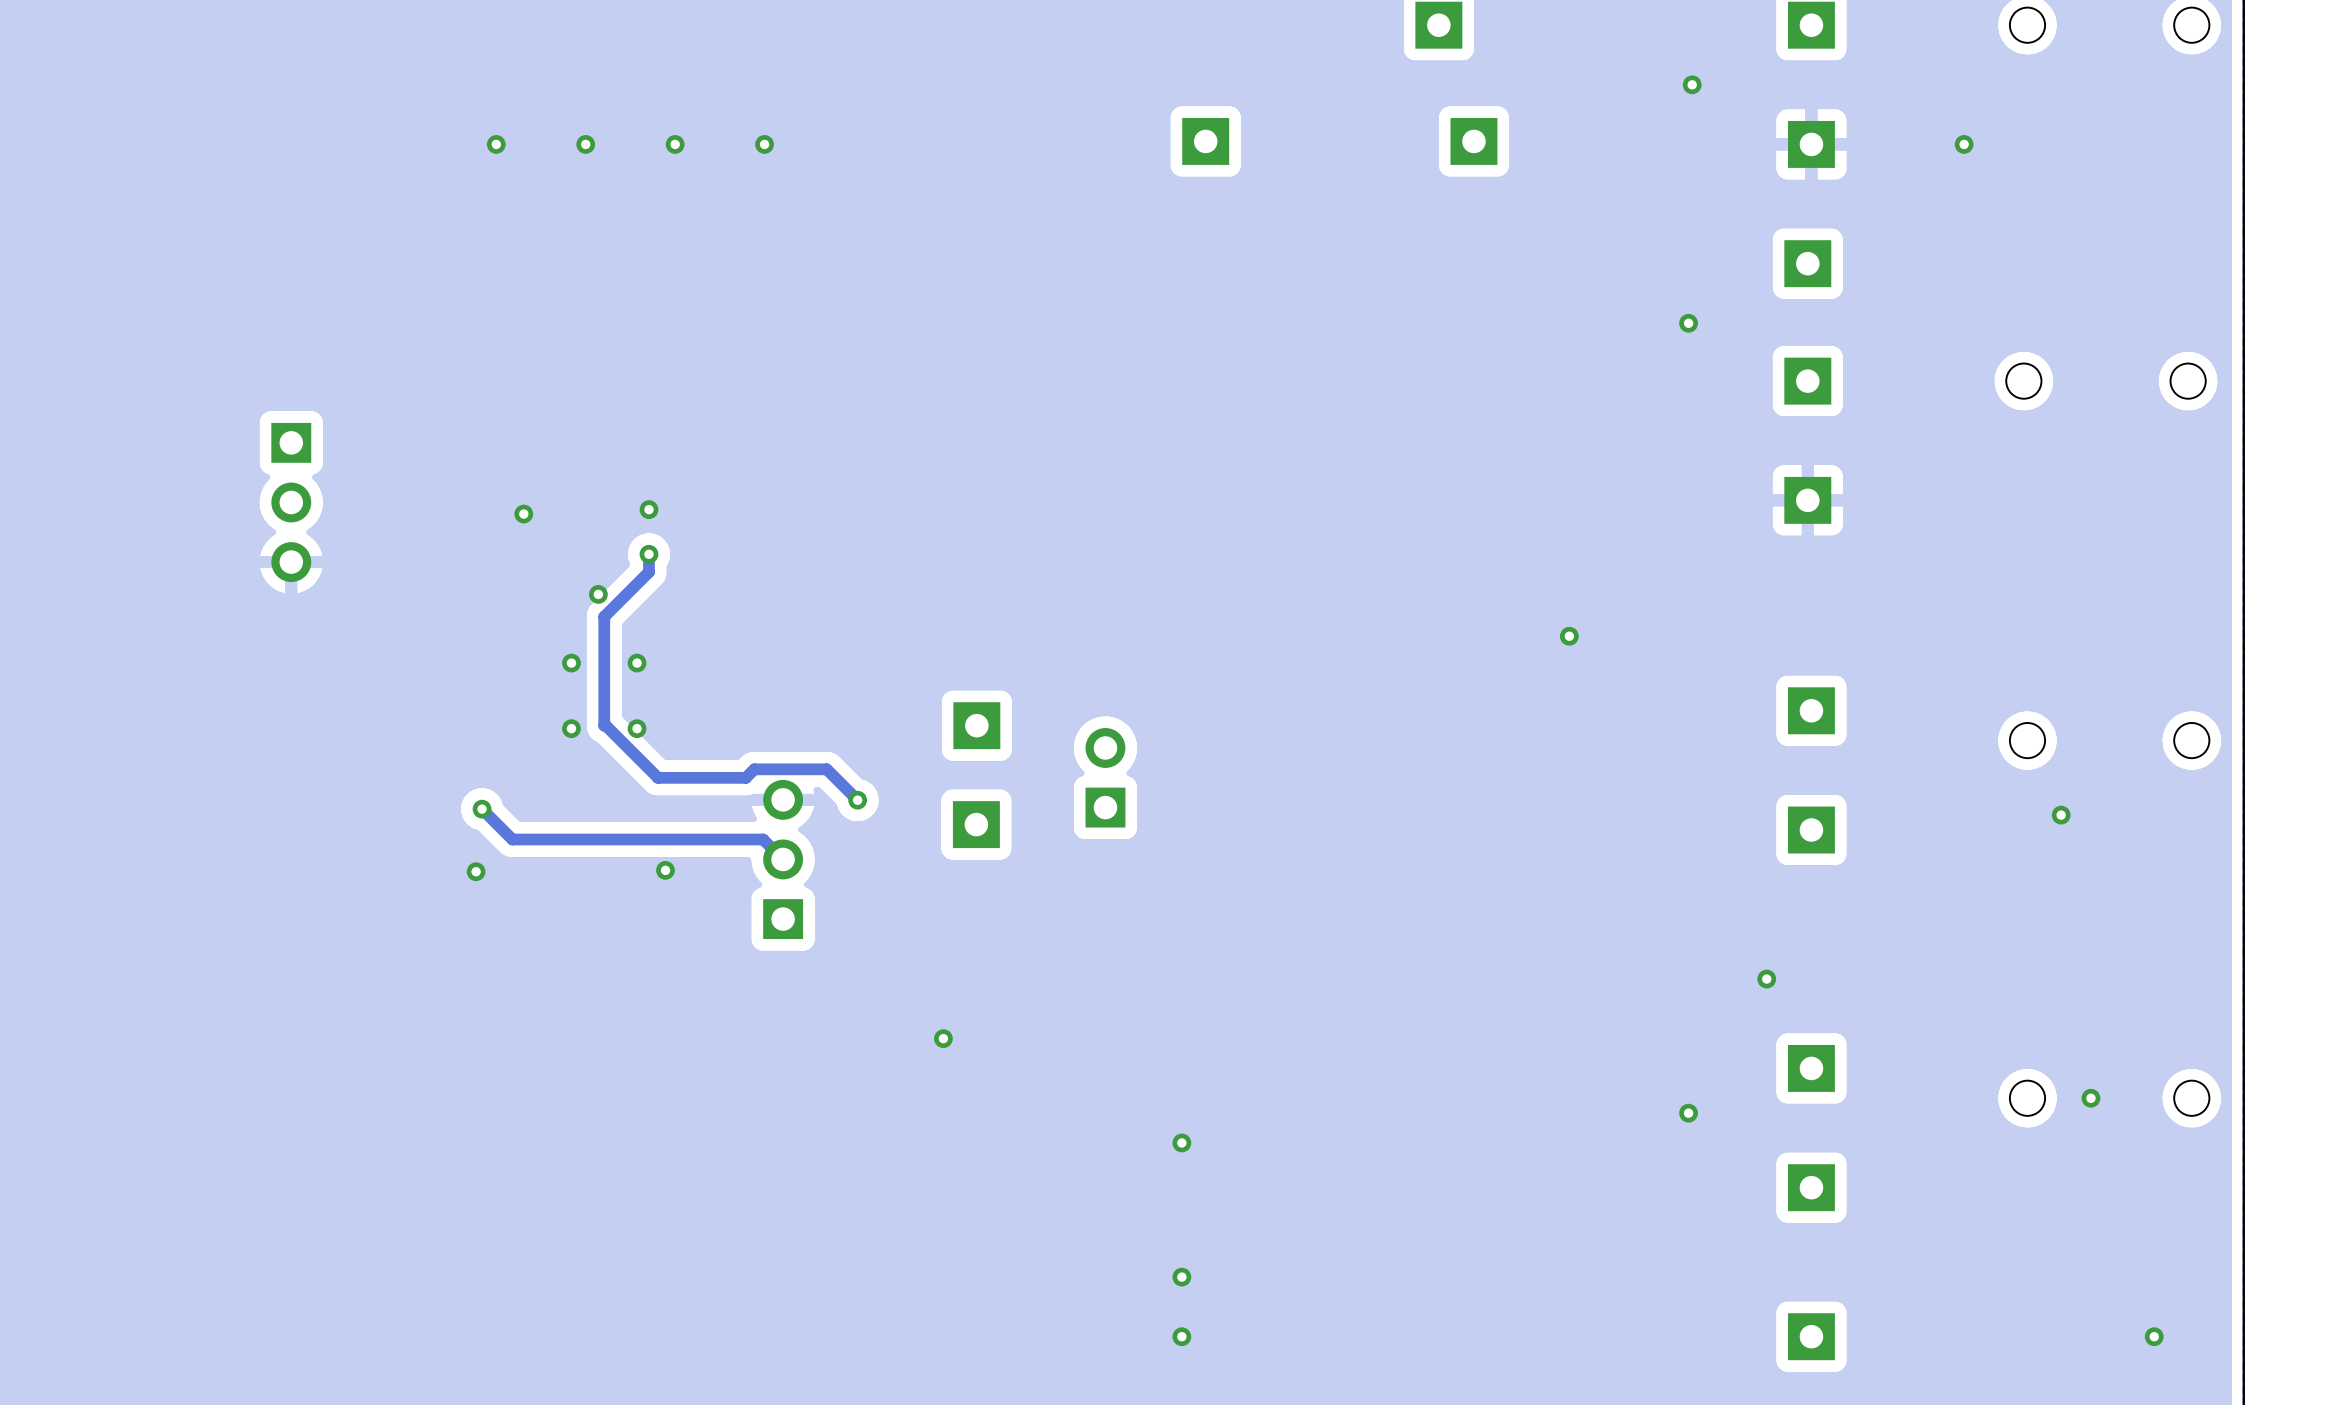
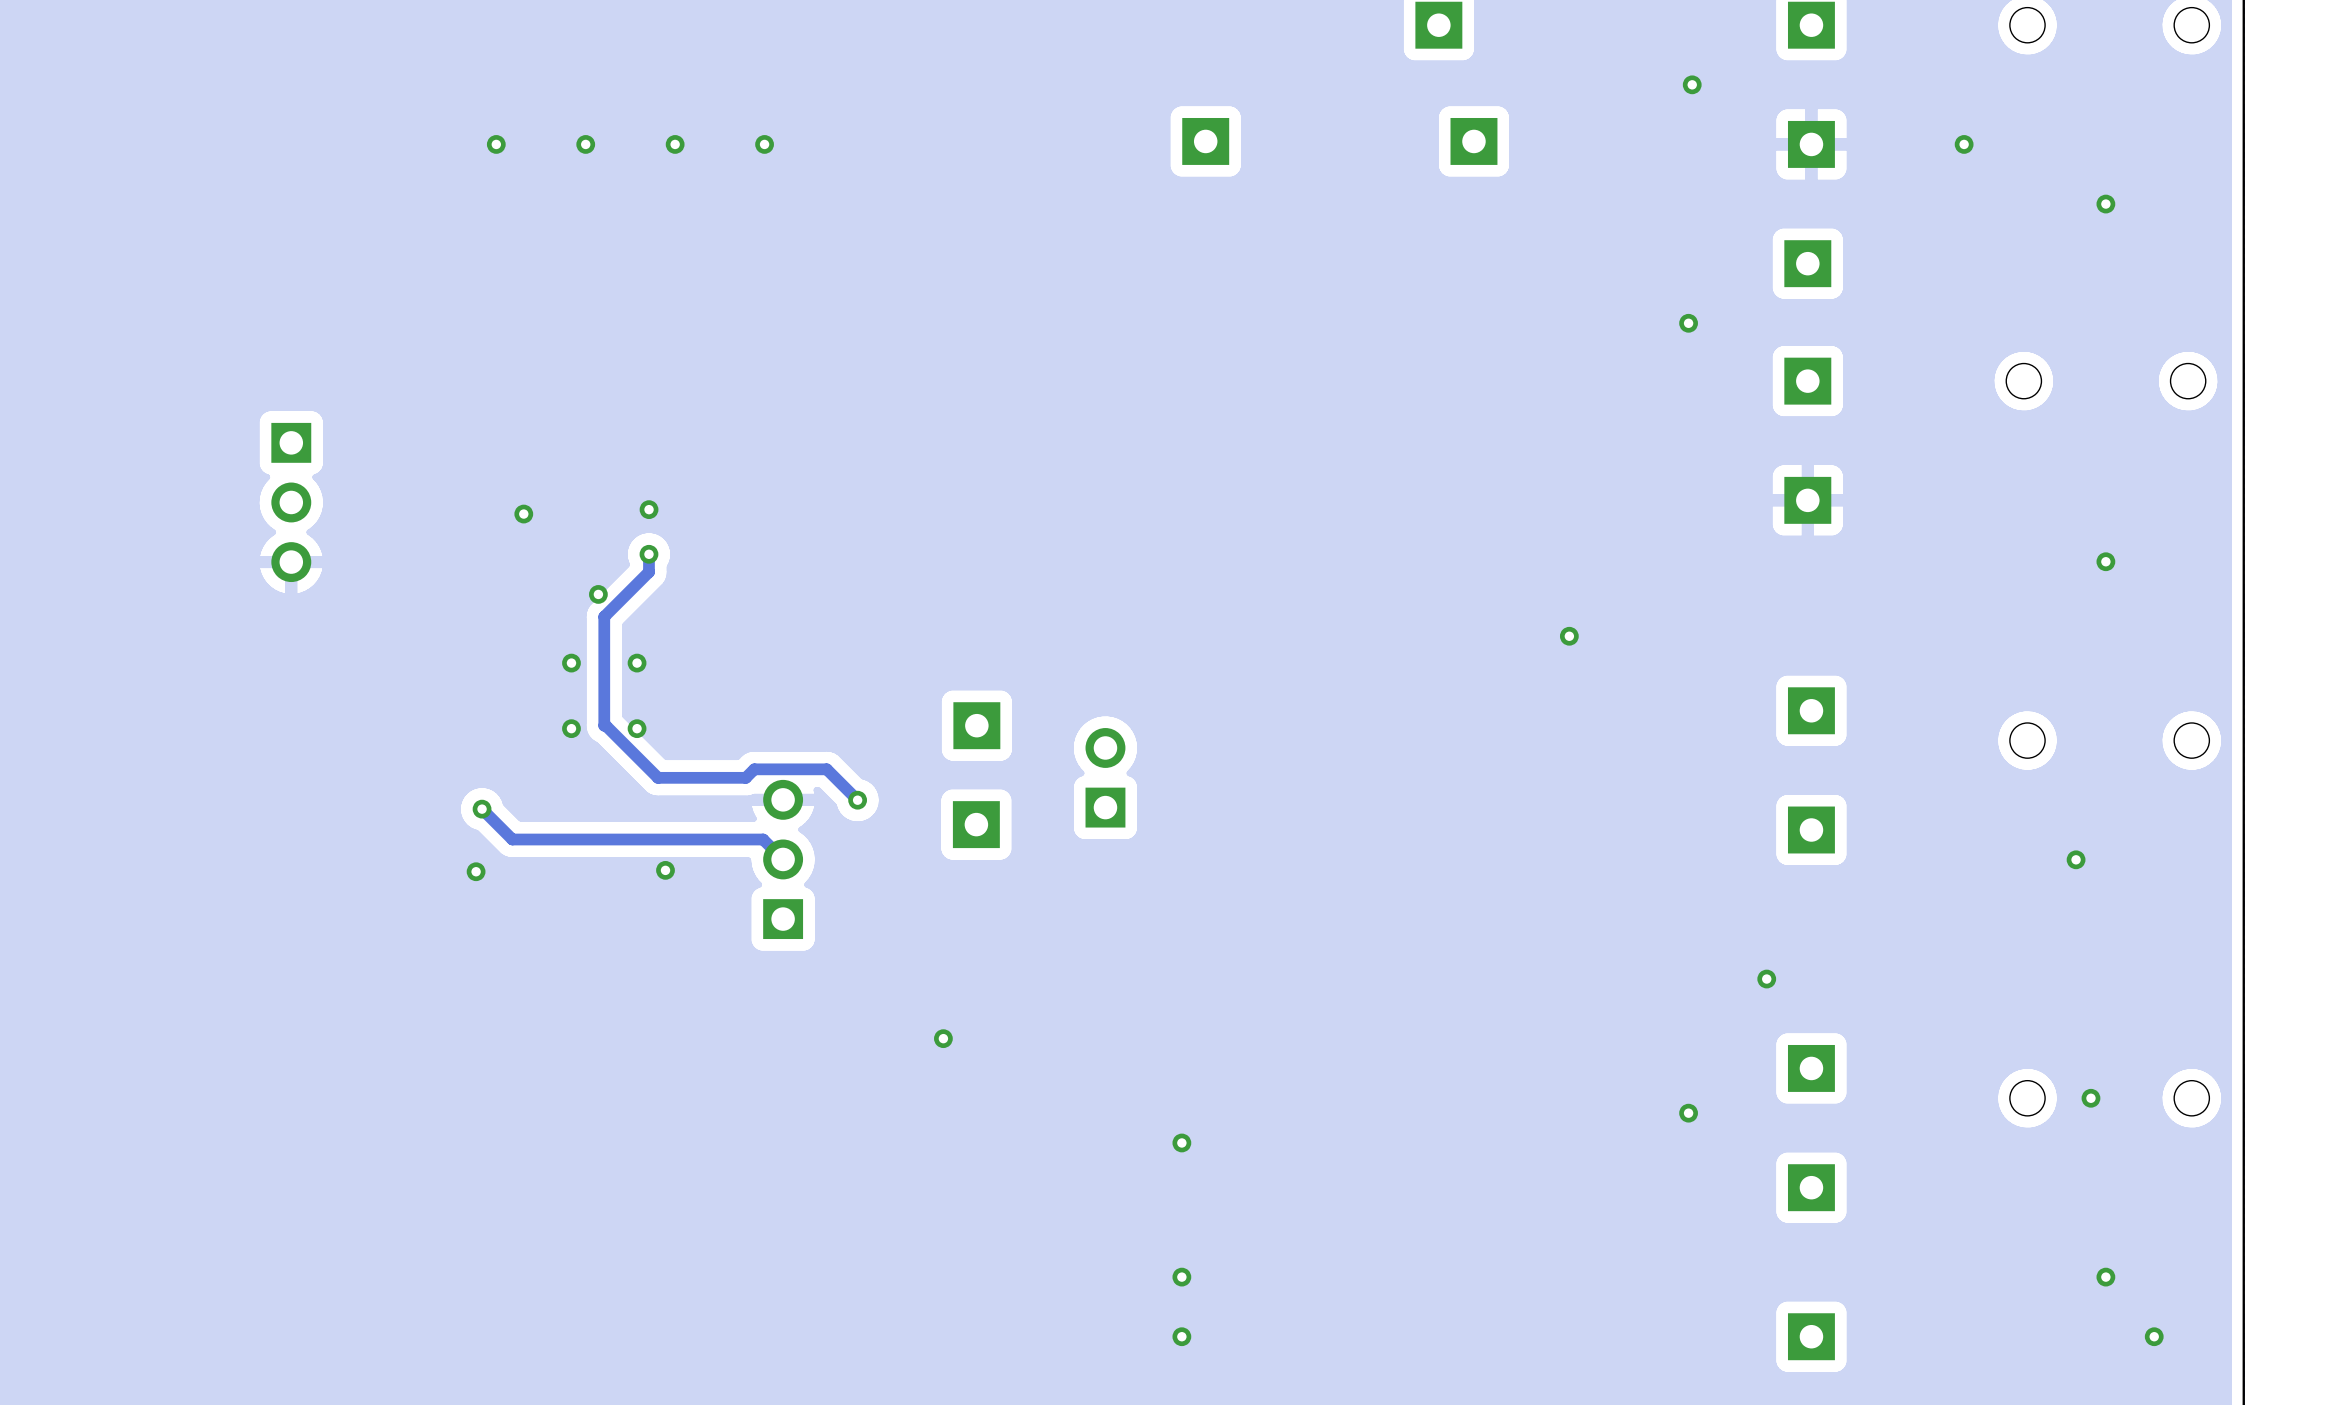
via: none -> (2105, 204)
via: none -> (2105, 561)
via position: (2061, 815) -> (2076, 859)
via: none -> (2105, 1277)

